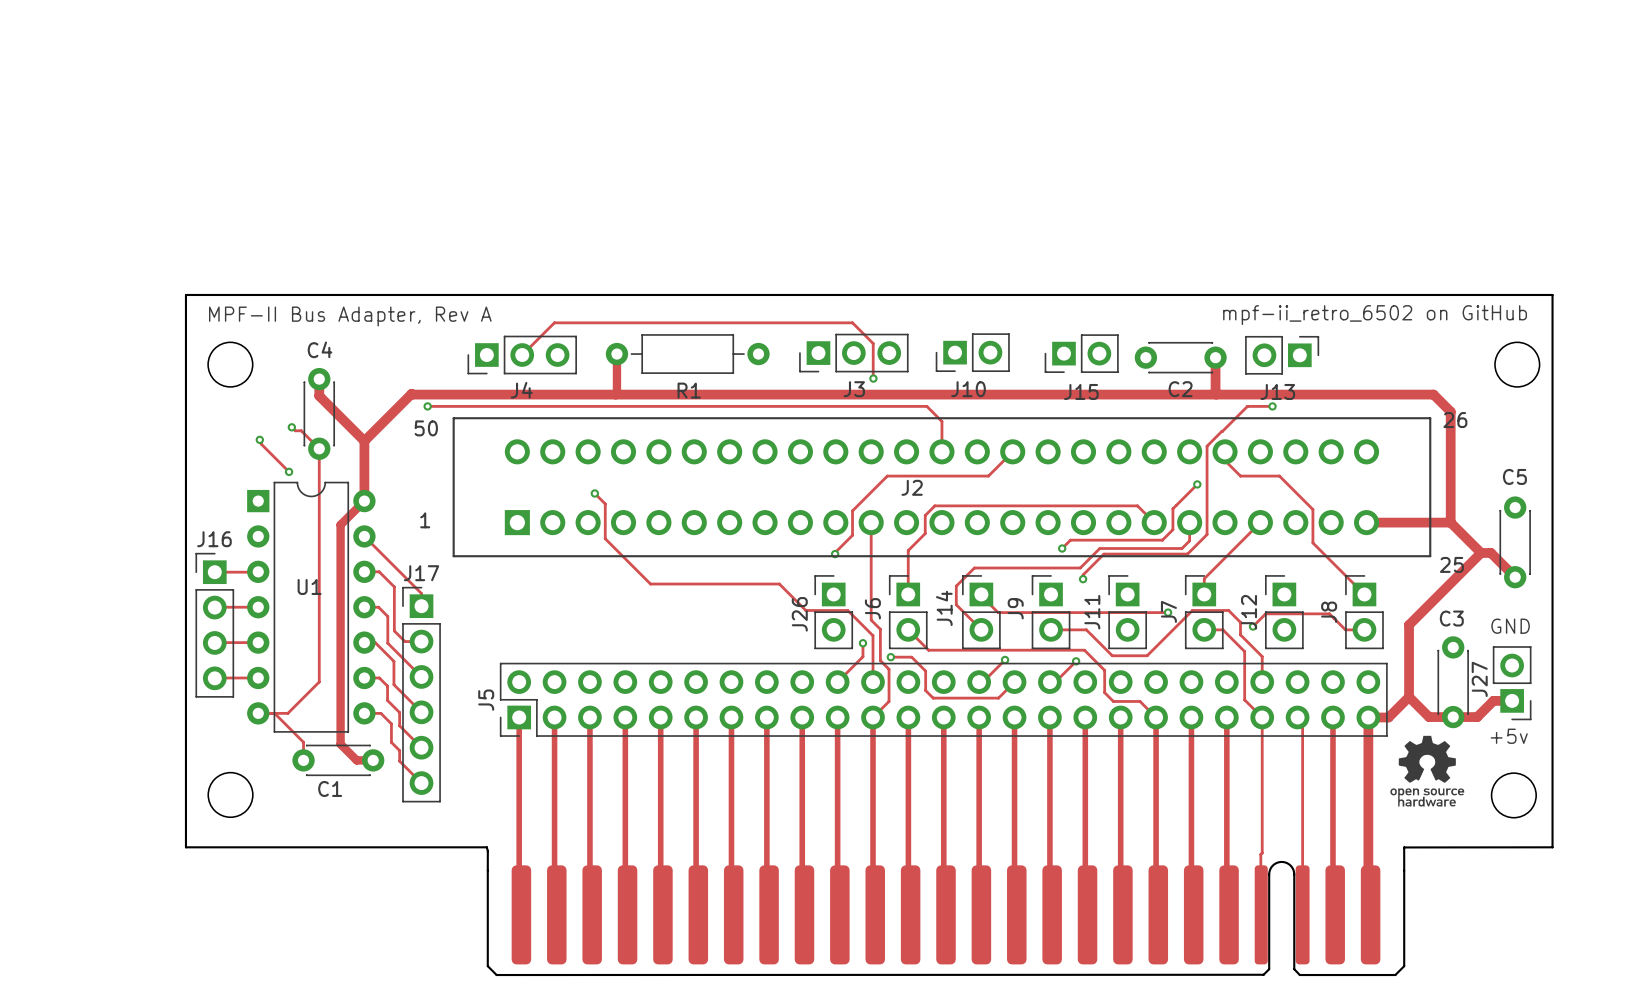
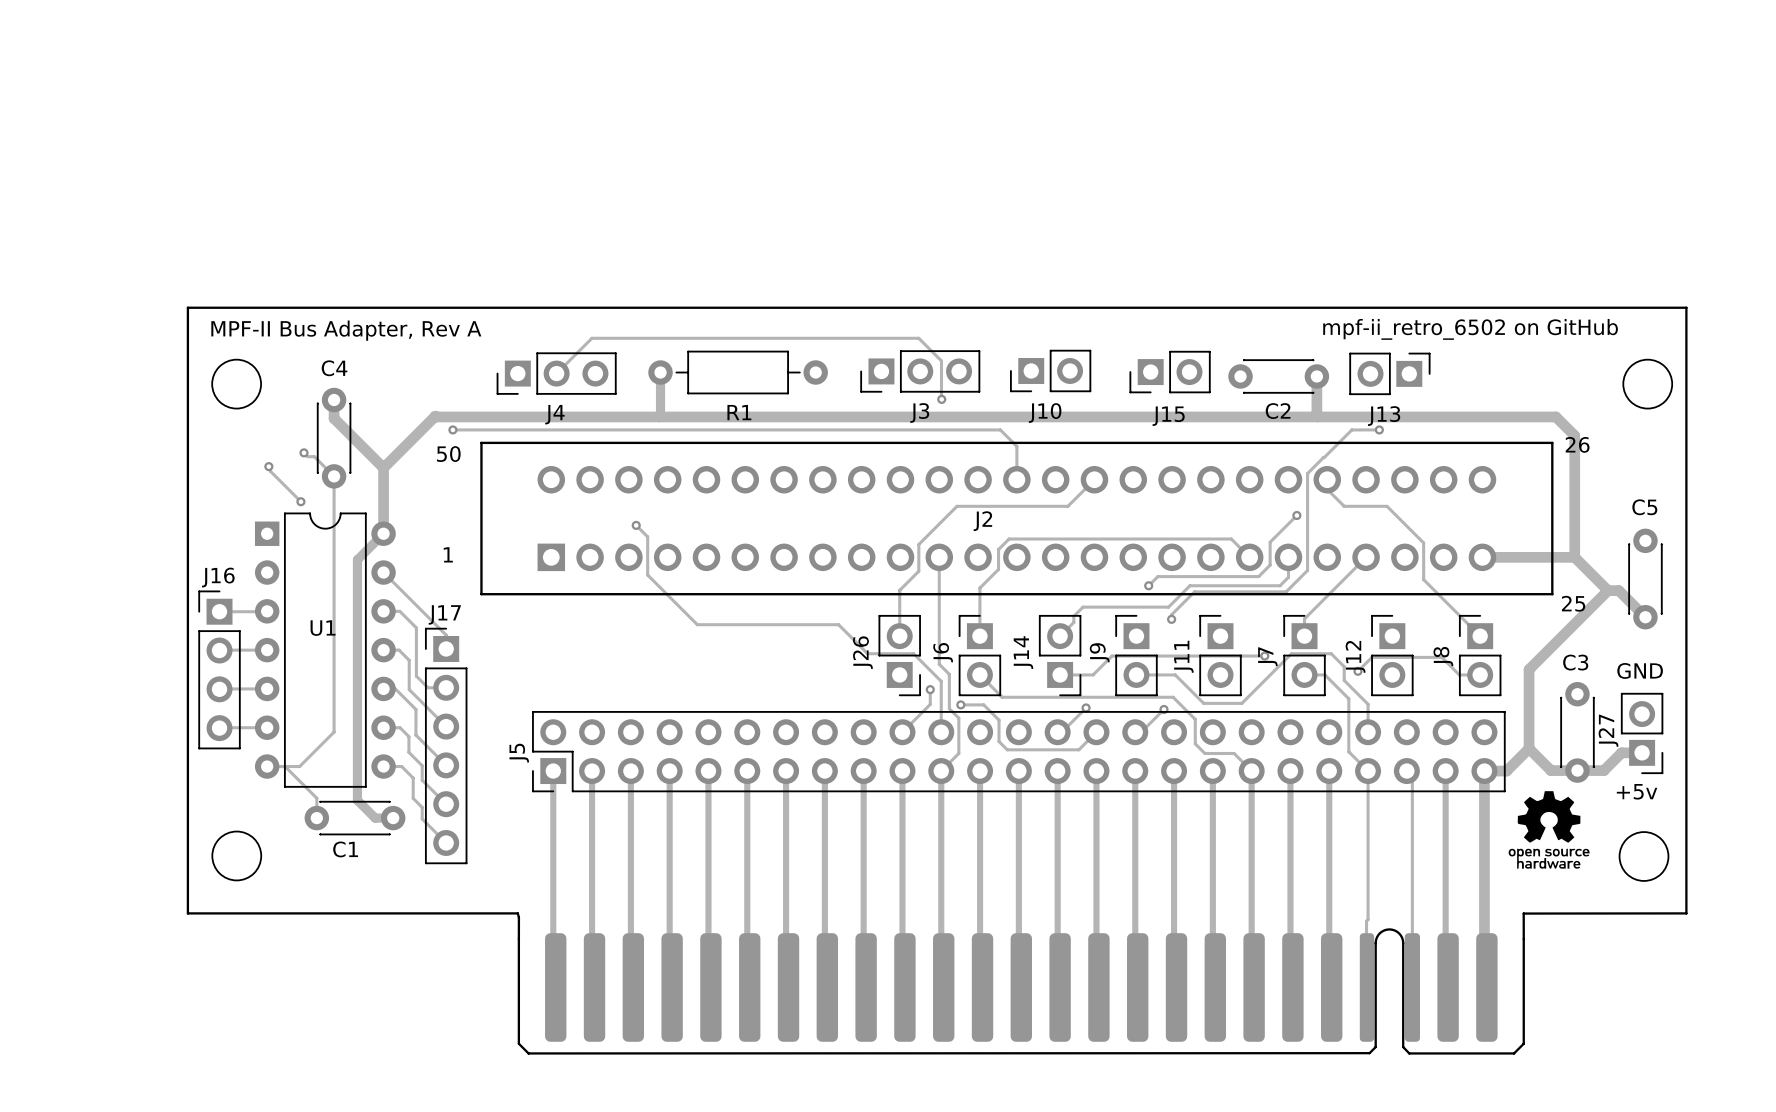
track: none -> (899, 591) (899, 636)
via: (835, 554) -> none
track: (1002, 568) (974, 568) (956, 586) (956, 604) (981, 629) -> (1083, 607) (1073, 616) (1073, 622) (1060, 636)
track: (981, 594) (998, 612) (1028, 612) -> (1060, 674) (1093, 674) (1112, 656)
J26 rotation: 0° (833, 612) -> 180° (899, 655)
J14 rotation: 0° (981, 612) -> 180° (1060, 655)

